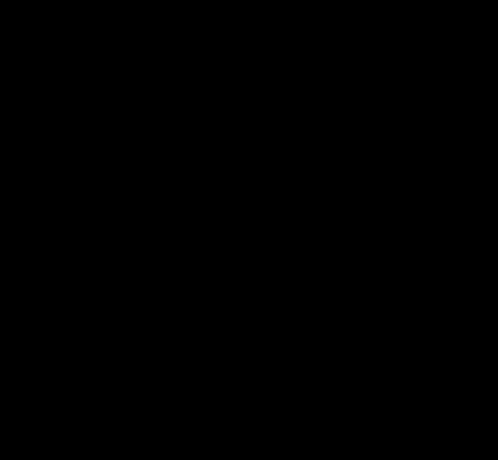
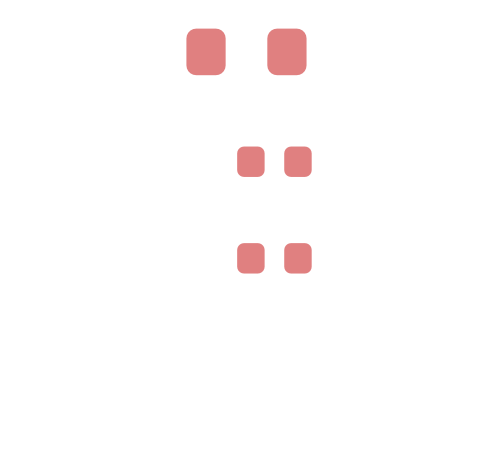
part: none -> (246, 51)
part: none -> (274, 161)
part: none -> (274, 258)

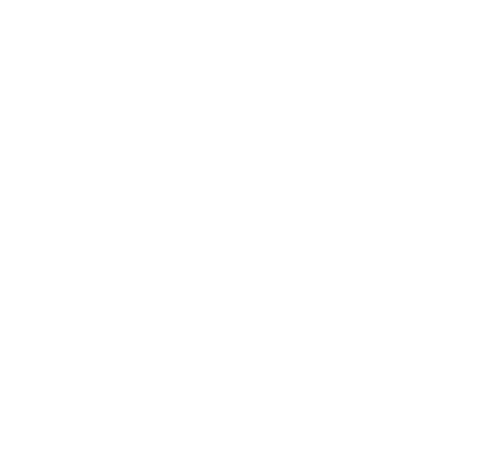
part: (246, 51) -> none
part: (274, 161) -> none
part: (274, 258) -> none

